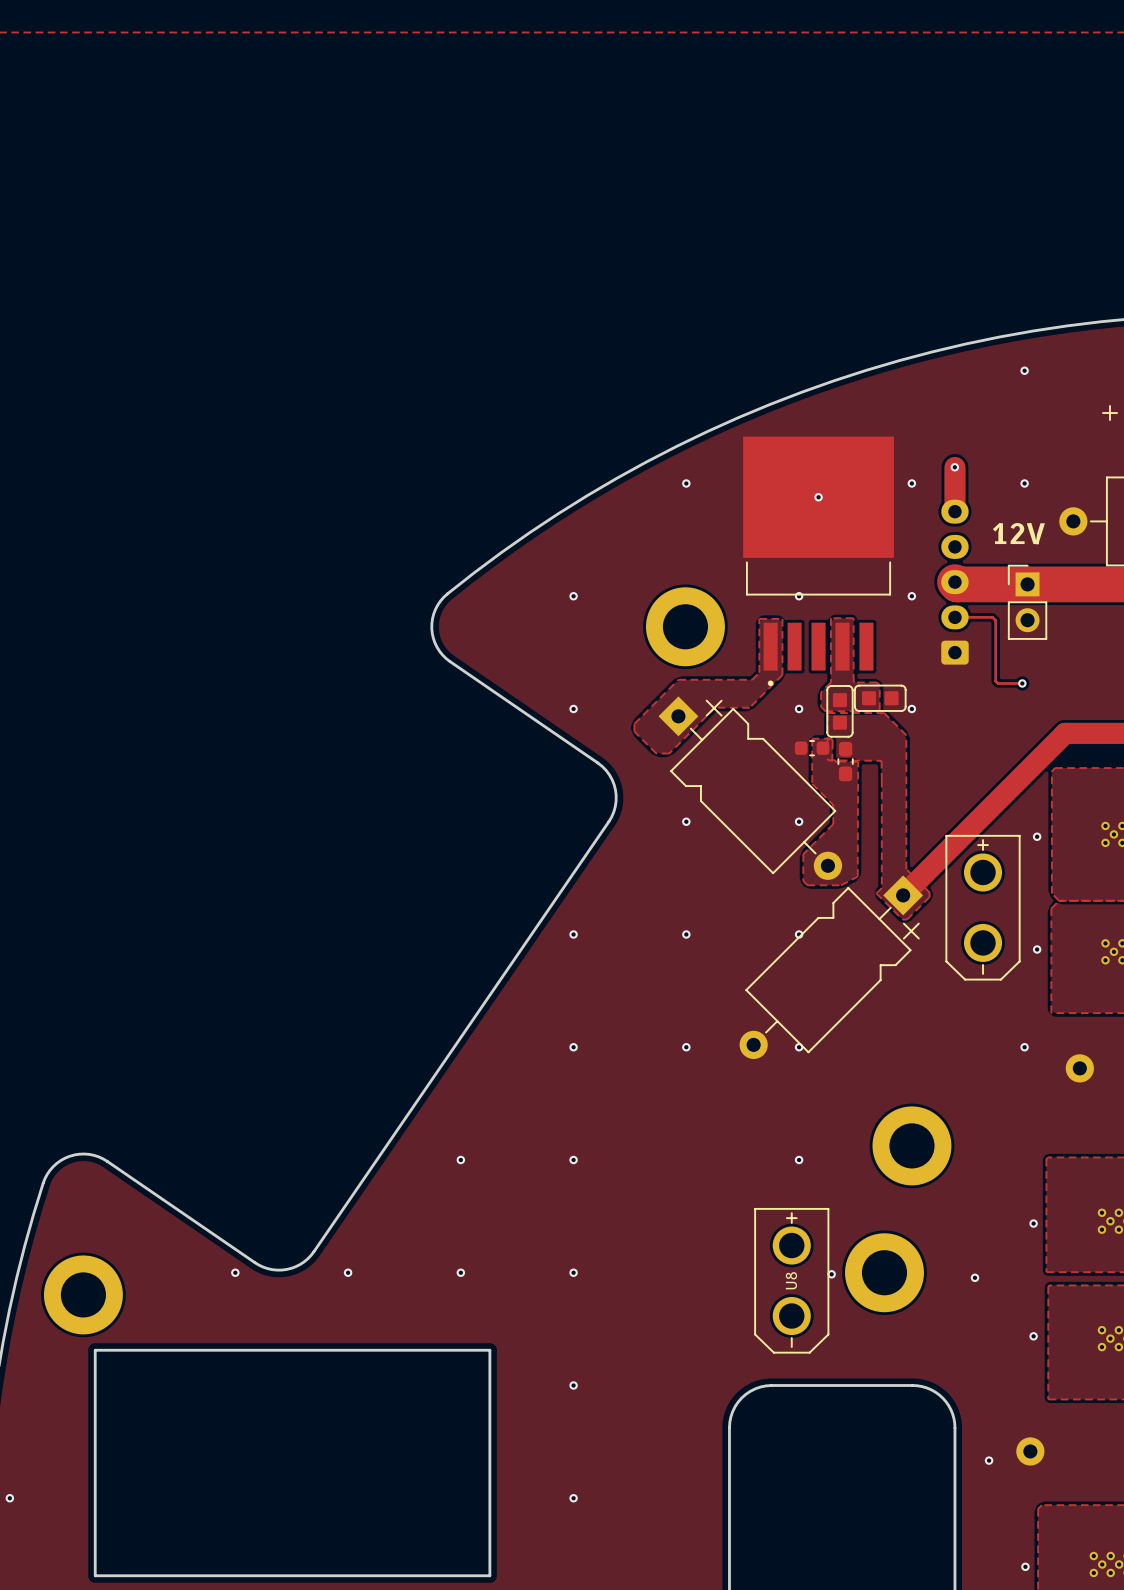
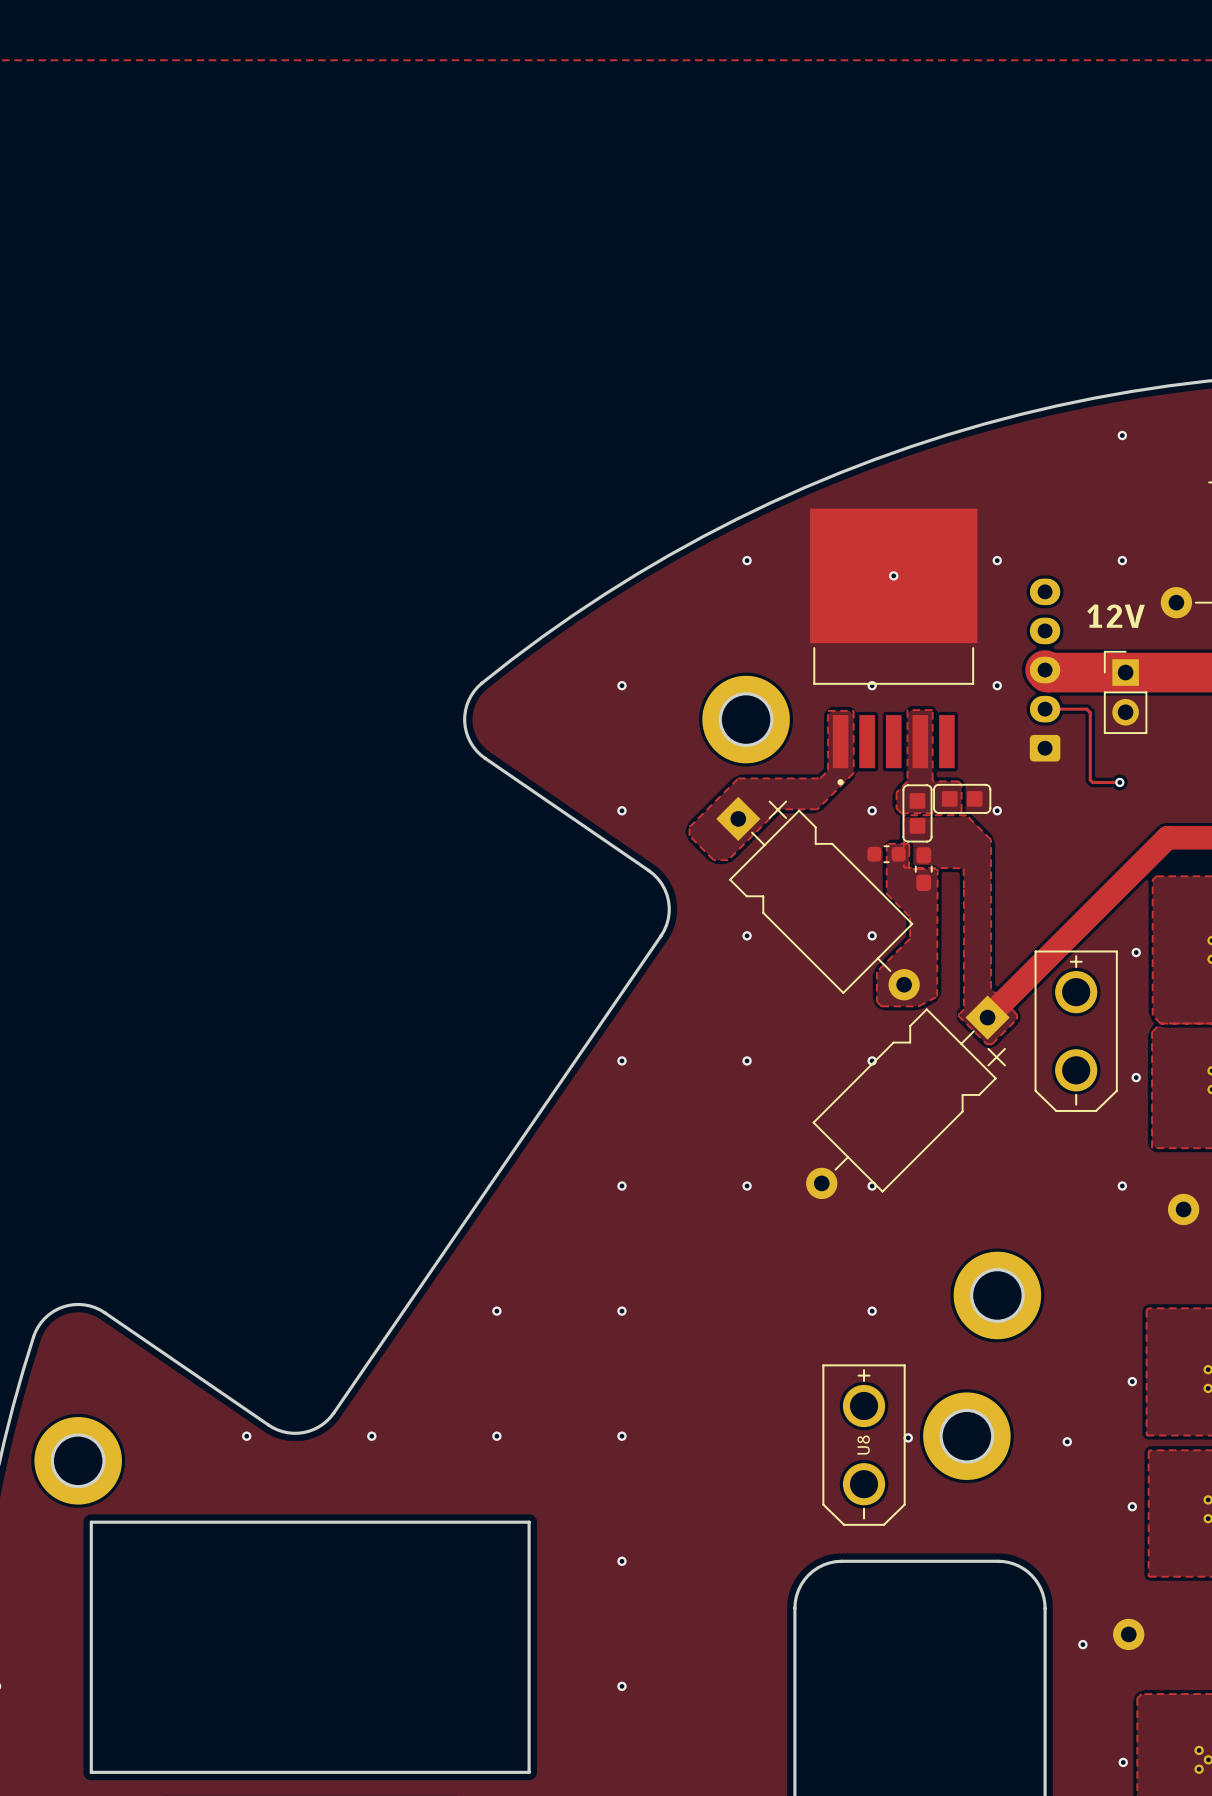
track: (954, 467) (954, 511) -> none
via: (954, 467) -> none
round board edge: none -> [718, 692, 774, 747]
round board edge: none -> [970, 1268, 1025, 1323]
round board edge: none -> [939, 1408, 995, 1464]
round board edge: none -> [50, 1433, 106, 1489]

